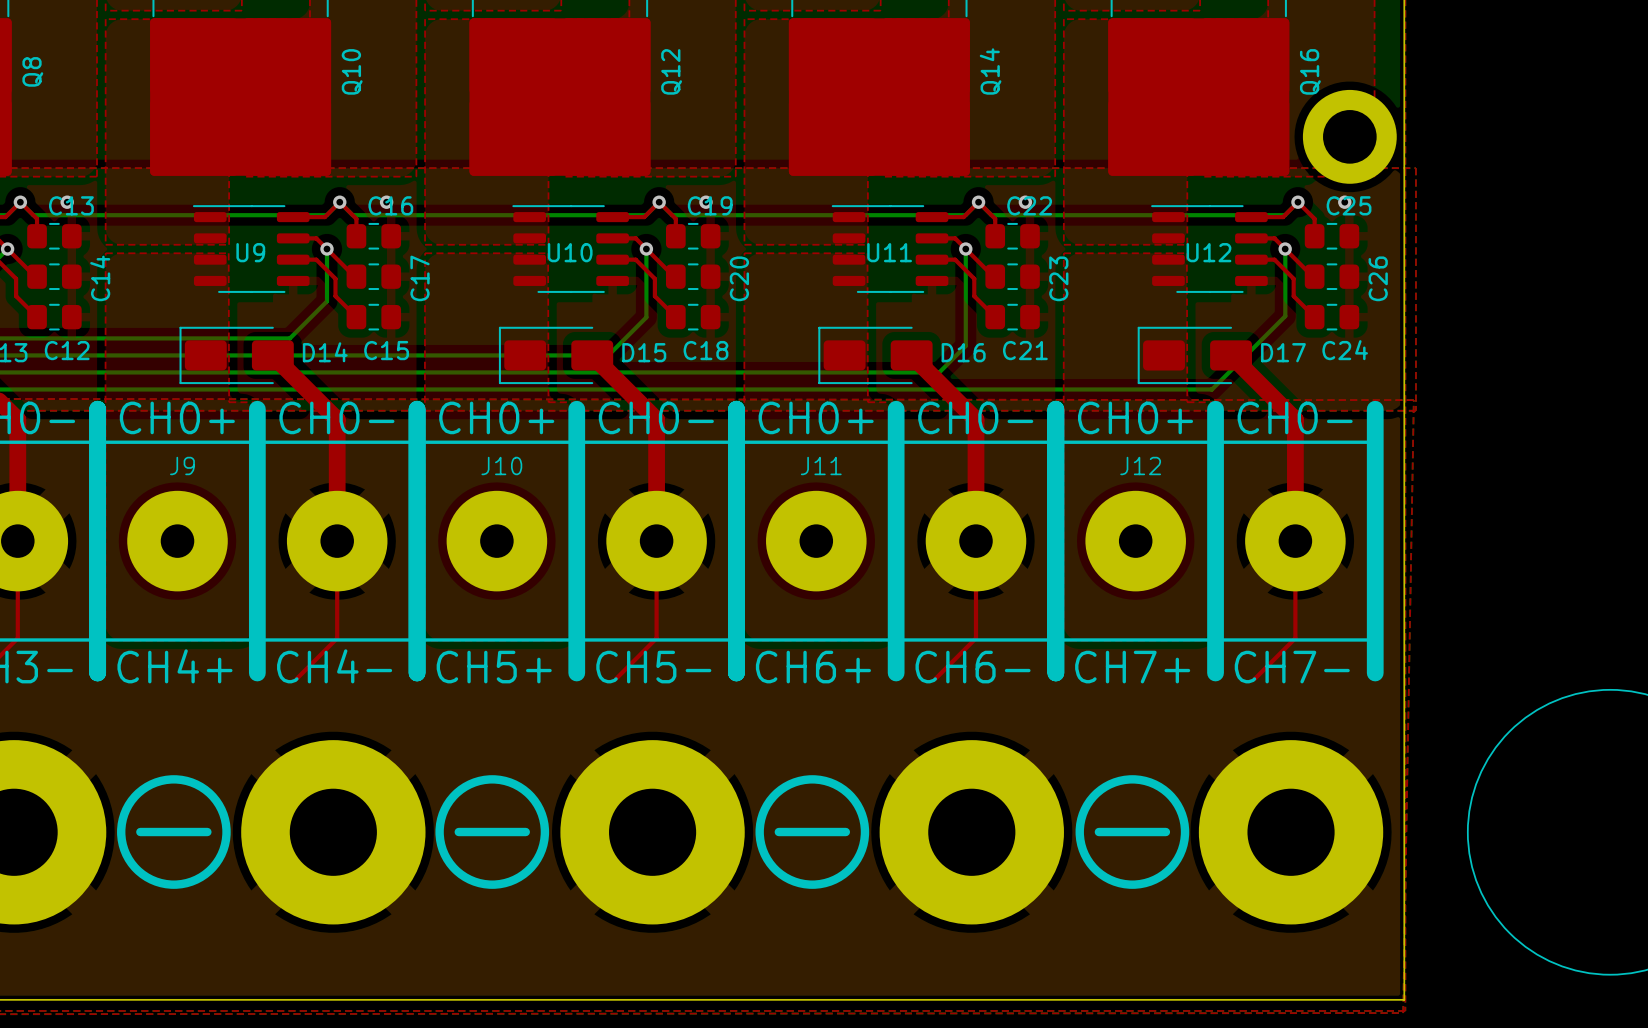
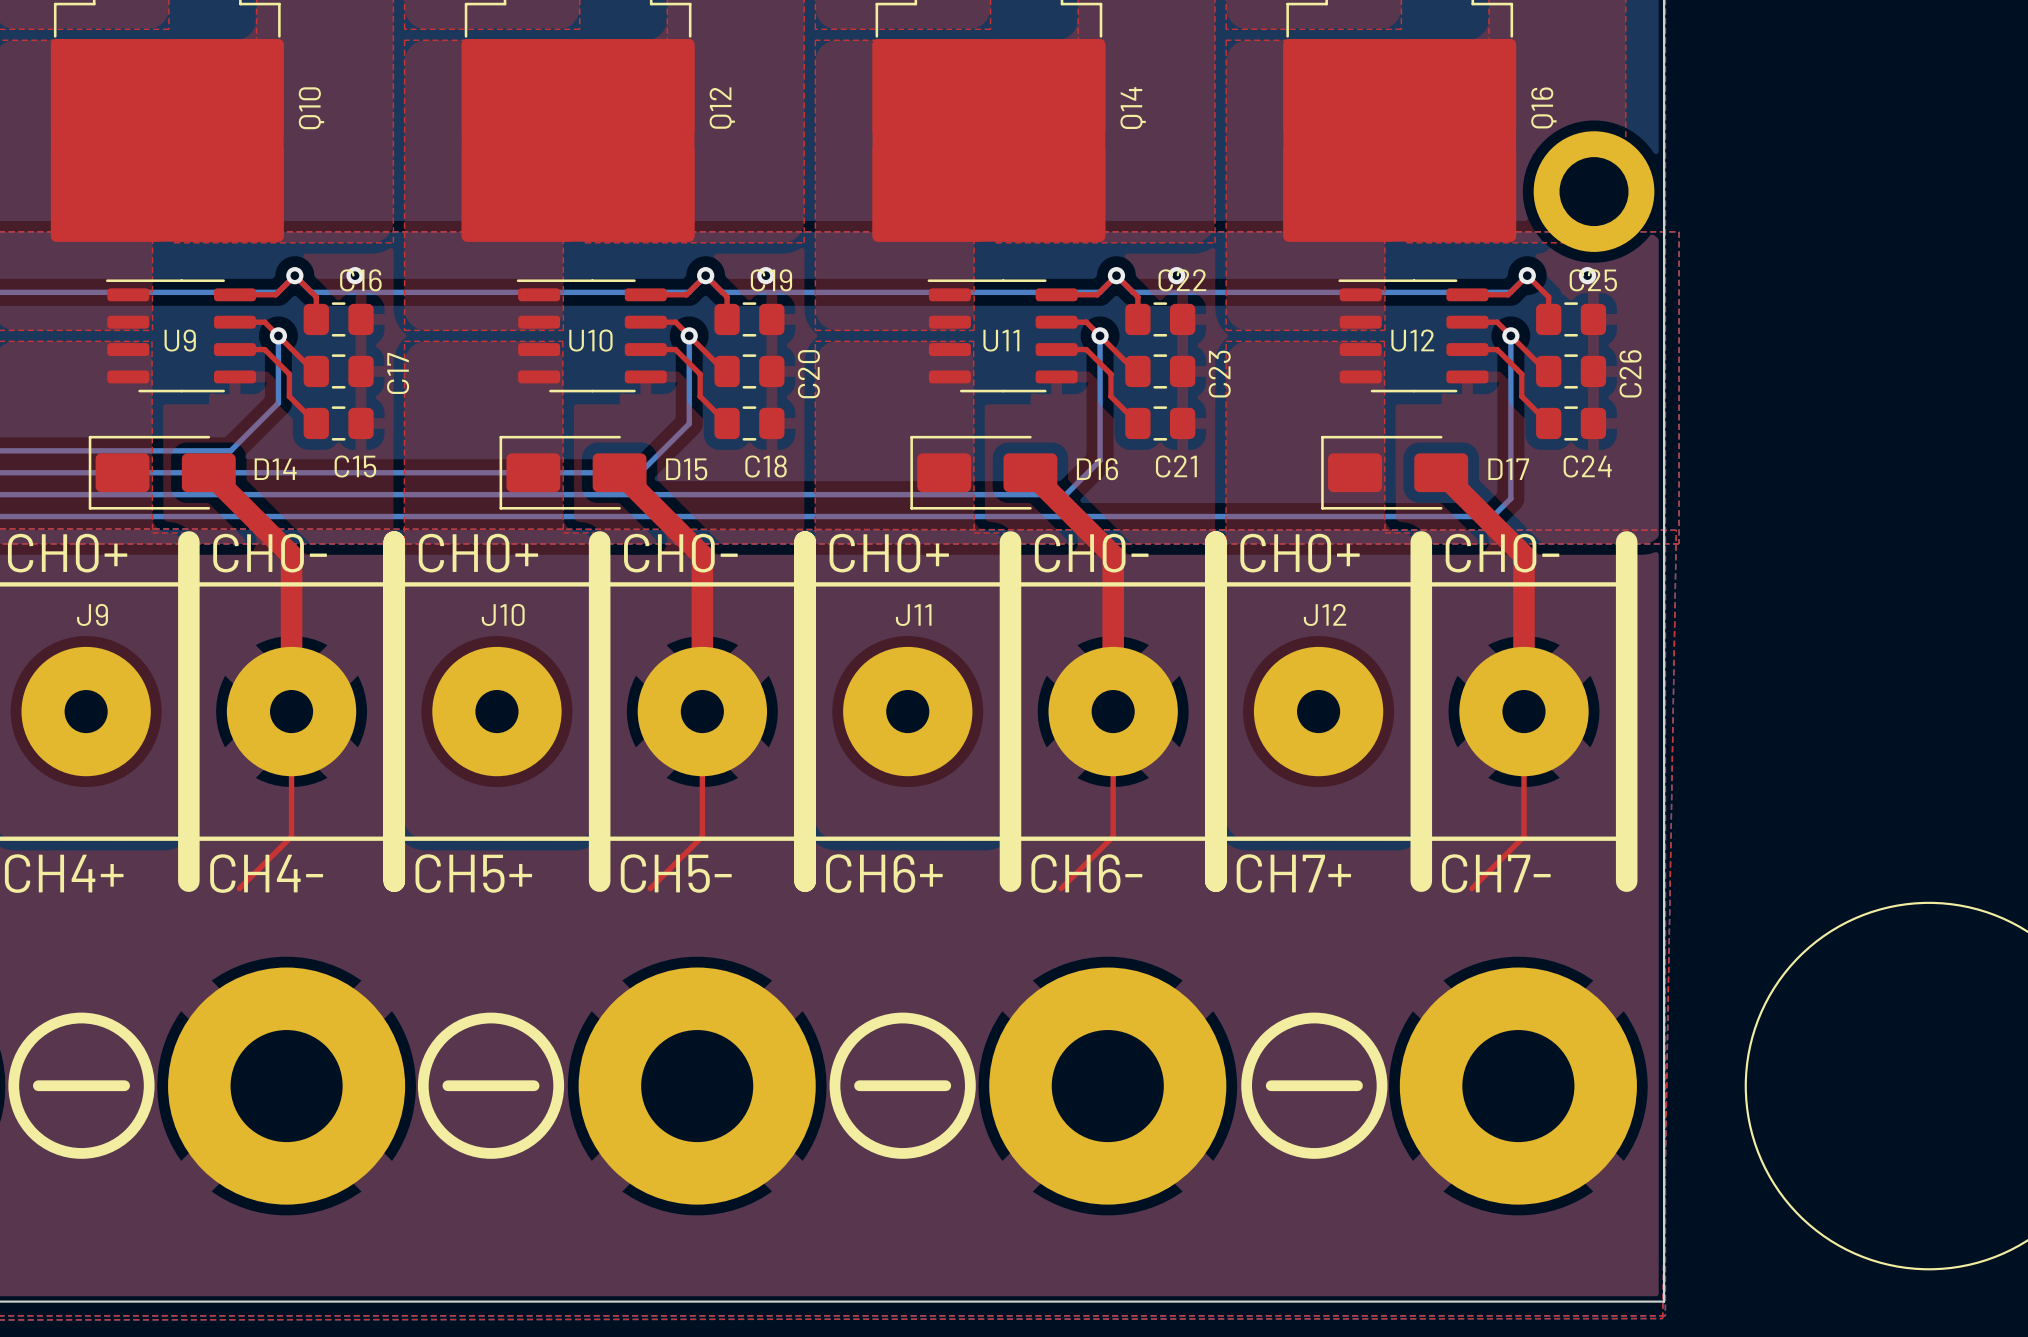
bottom track: (1285, 249) (1285, 316) (1211, 389) -> (1510, 335) (1510, 498) (1492, 516) (1416, 516)

